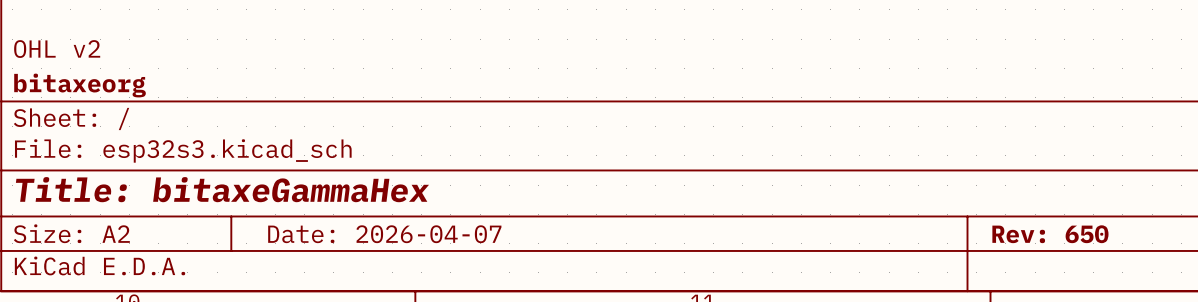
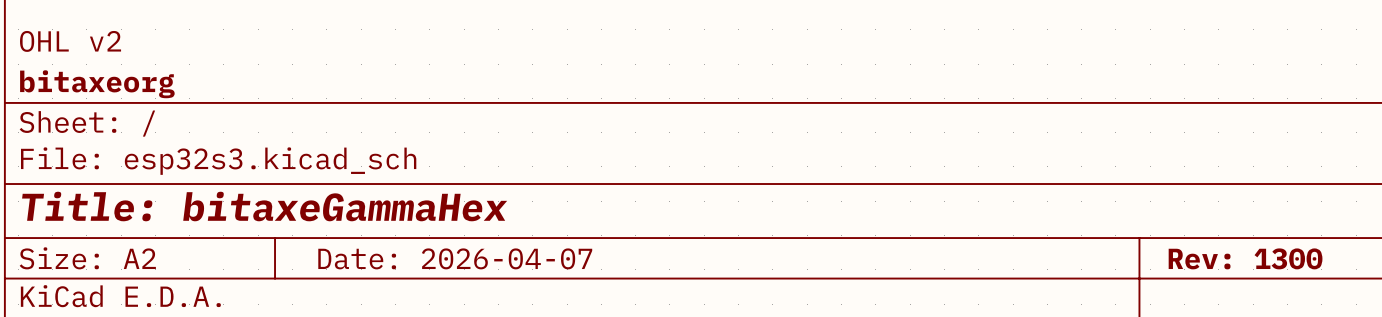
title block: Rev: 650 (1050, 234) -> Rev: 1300 (1245, 258)

